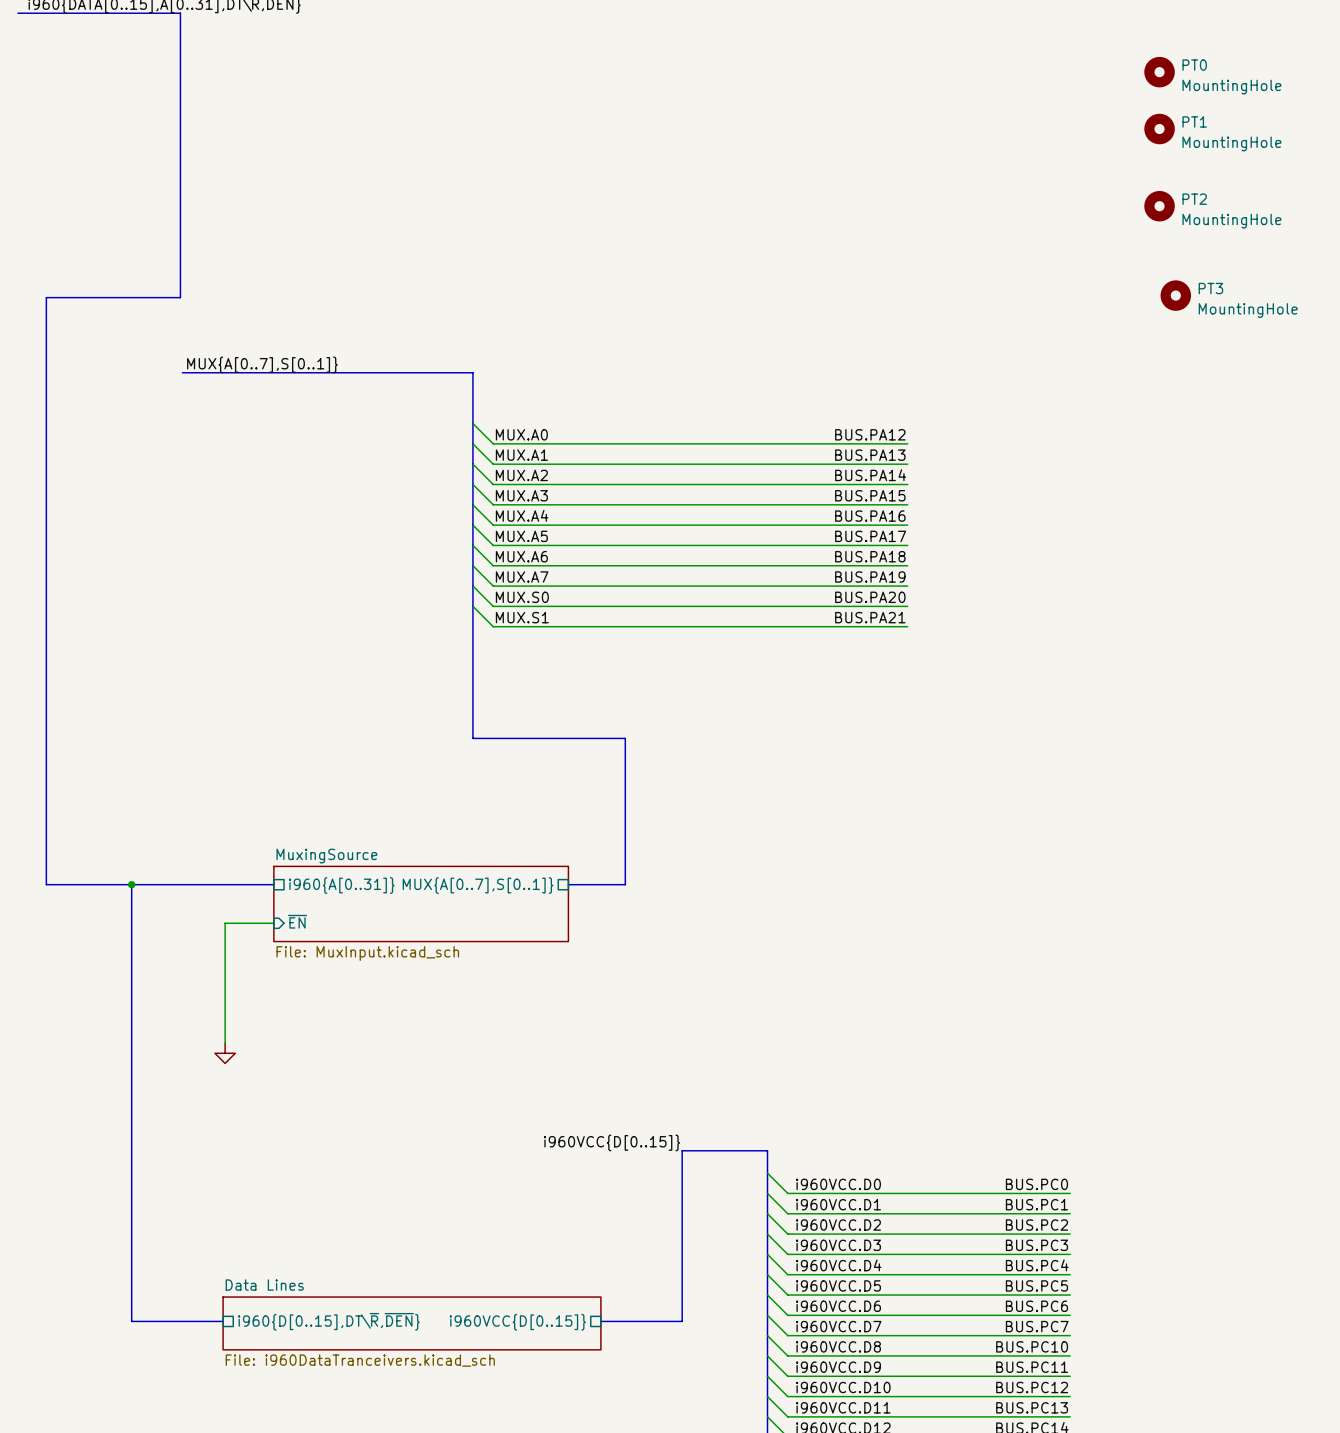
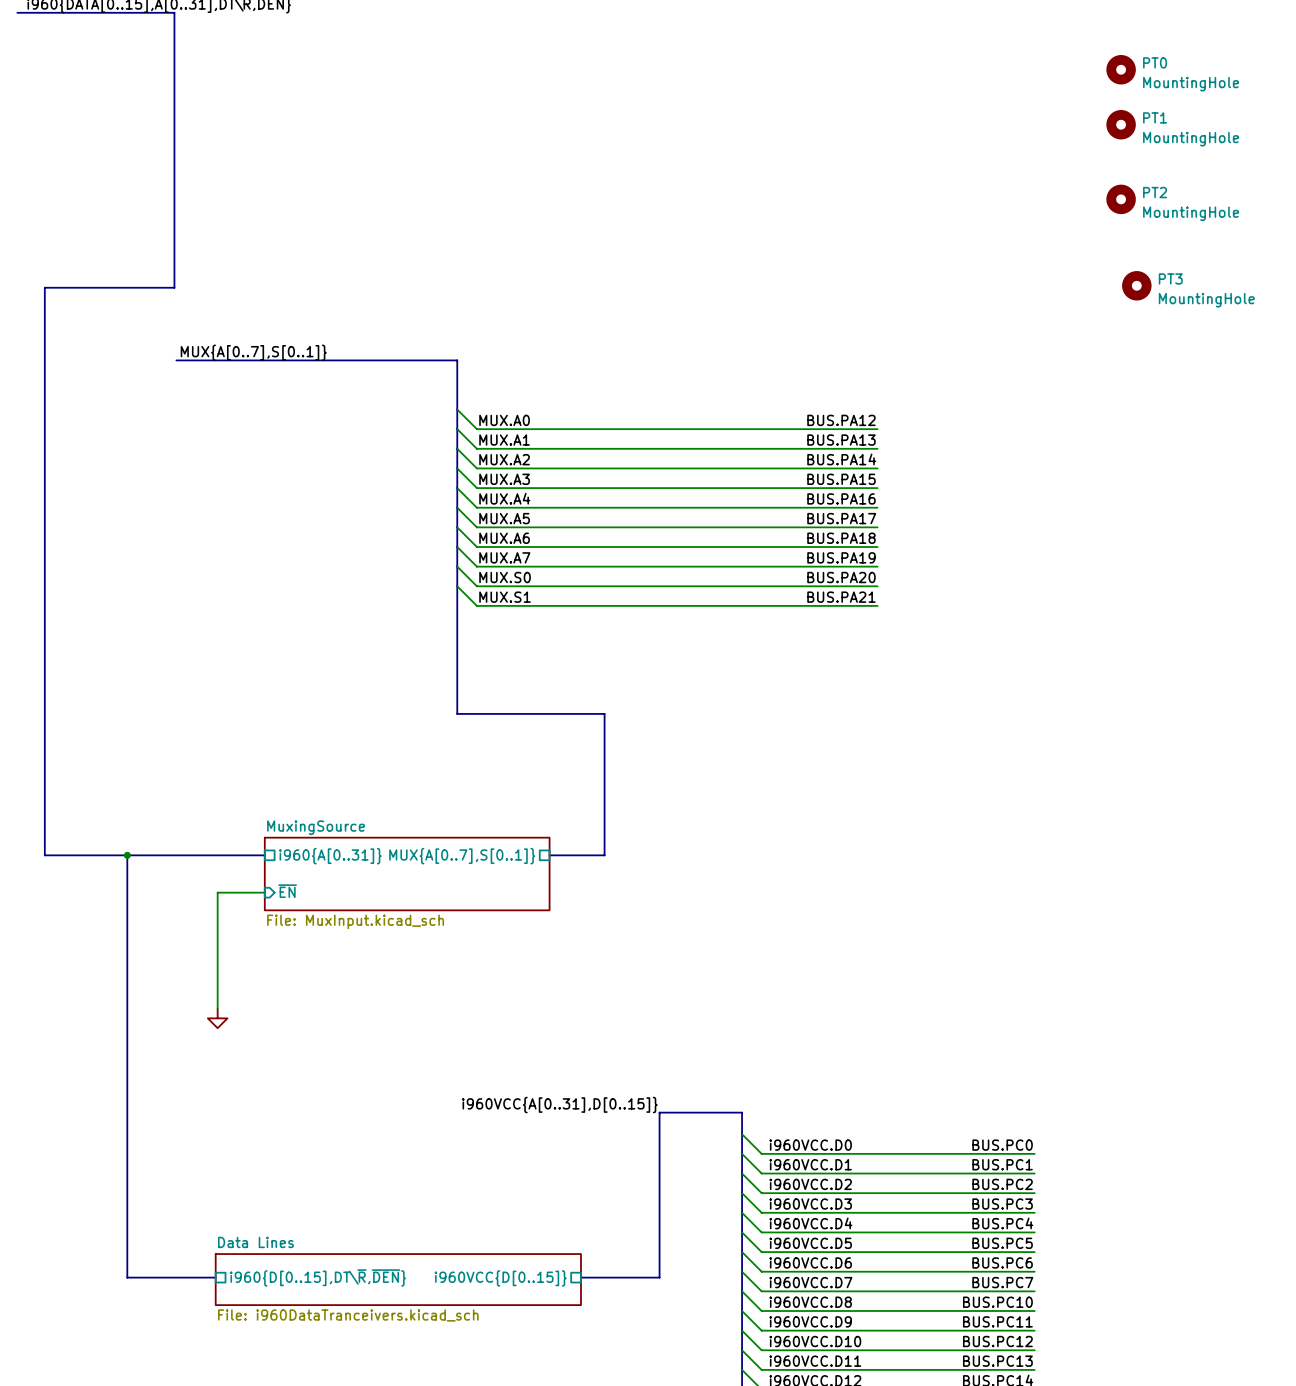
label: i960VCC{D[0..15]} (611, 1142) -> i960VCC{A[0..31],D[0..15]} (559, 1105)

